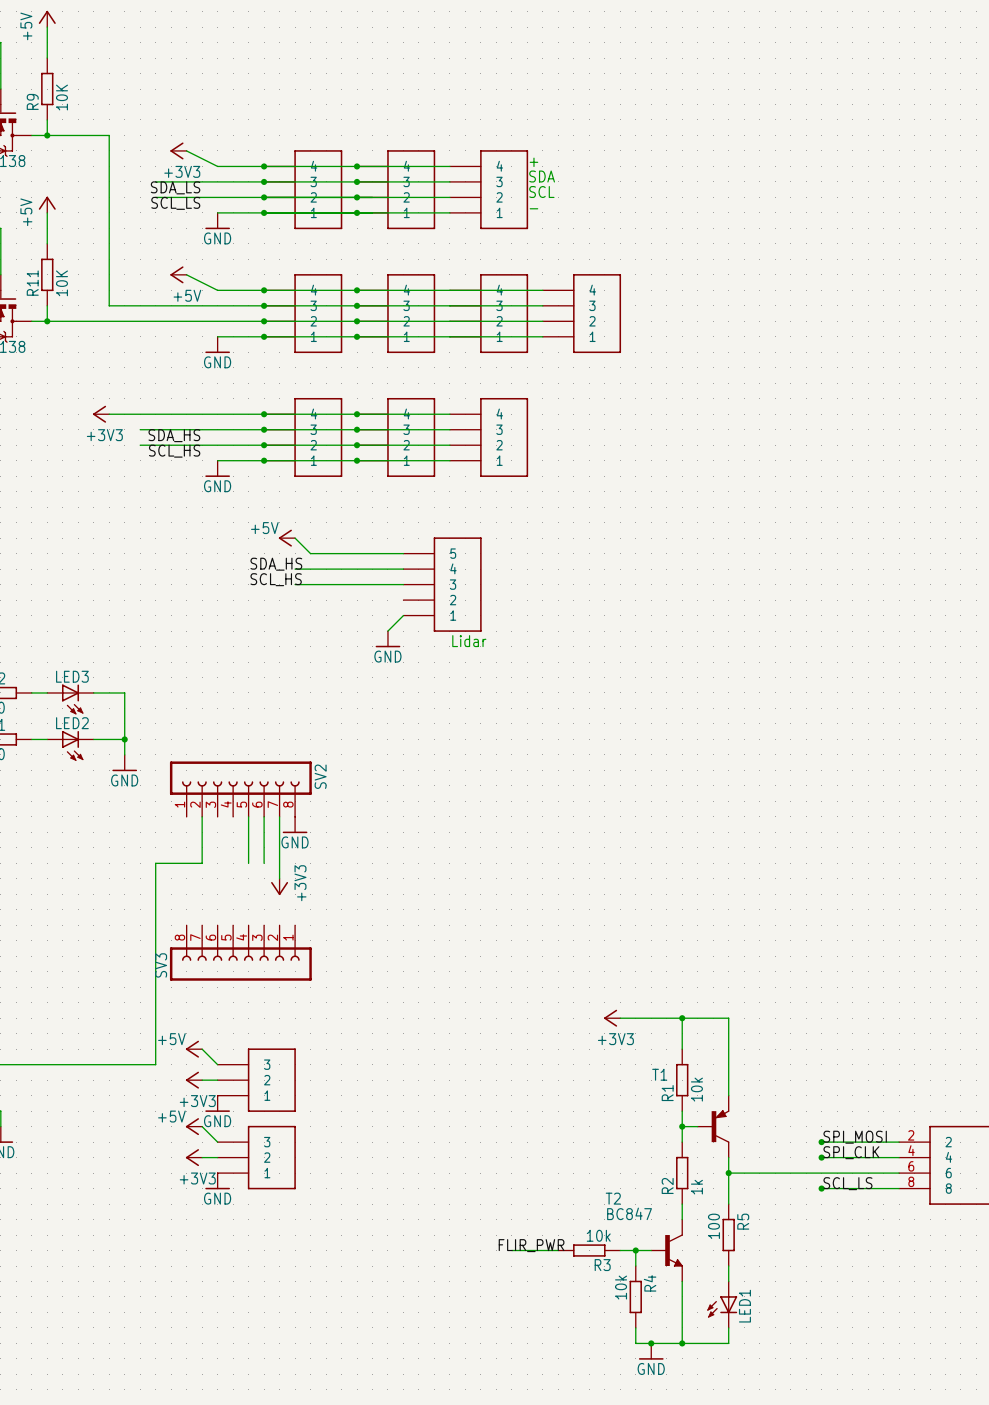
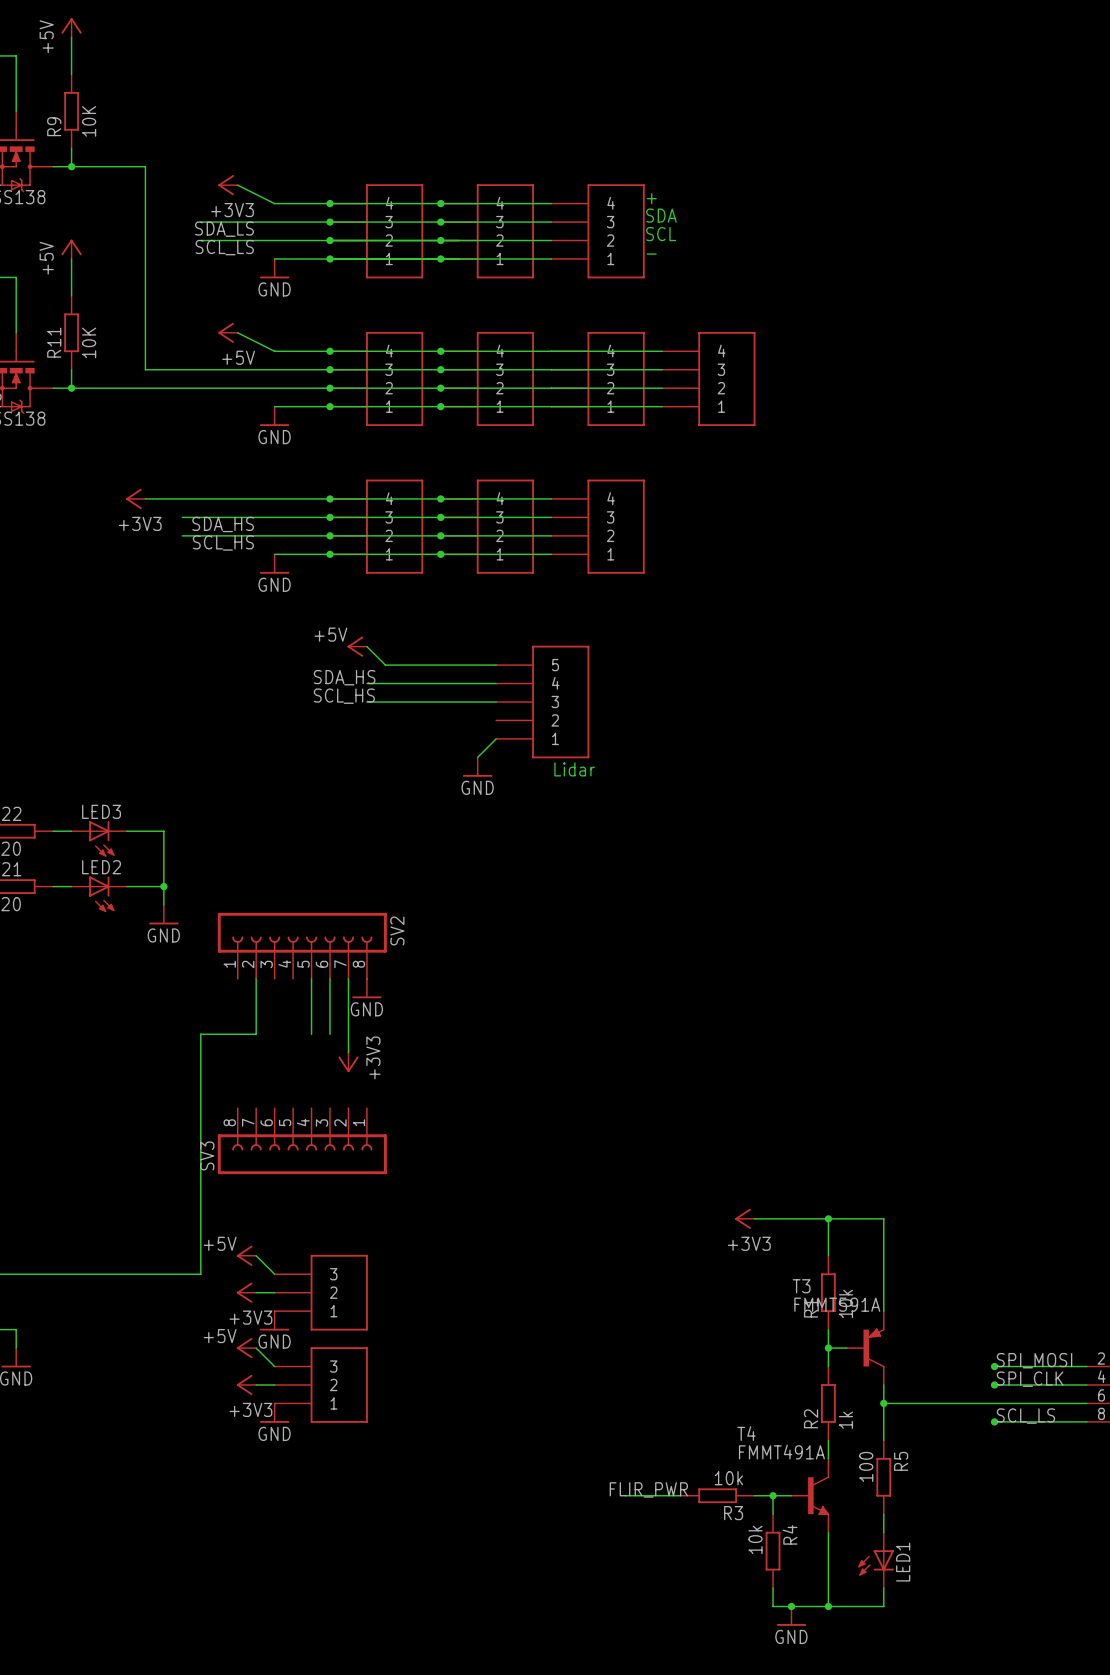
T1 name: T1 (659, 1074) -> T3 (801, 1286)
T1 value: none -> FMMT591A (837, 1304)
T2 name: T2 (613, 1198) -> T4 (746, 1433)
T2 value: BC847 (629, 1213) -> FMMT491A (781, 1452)

